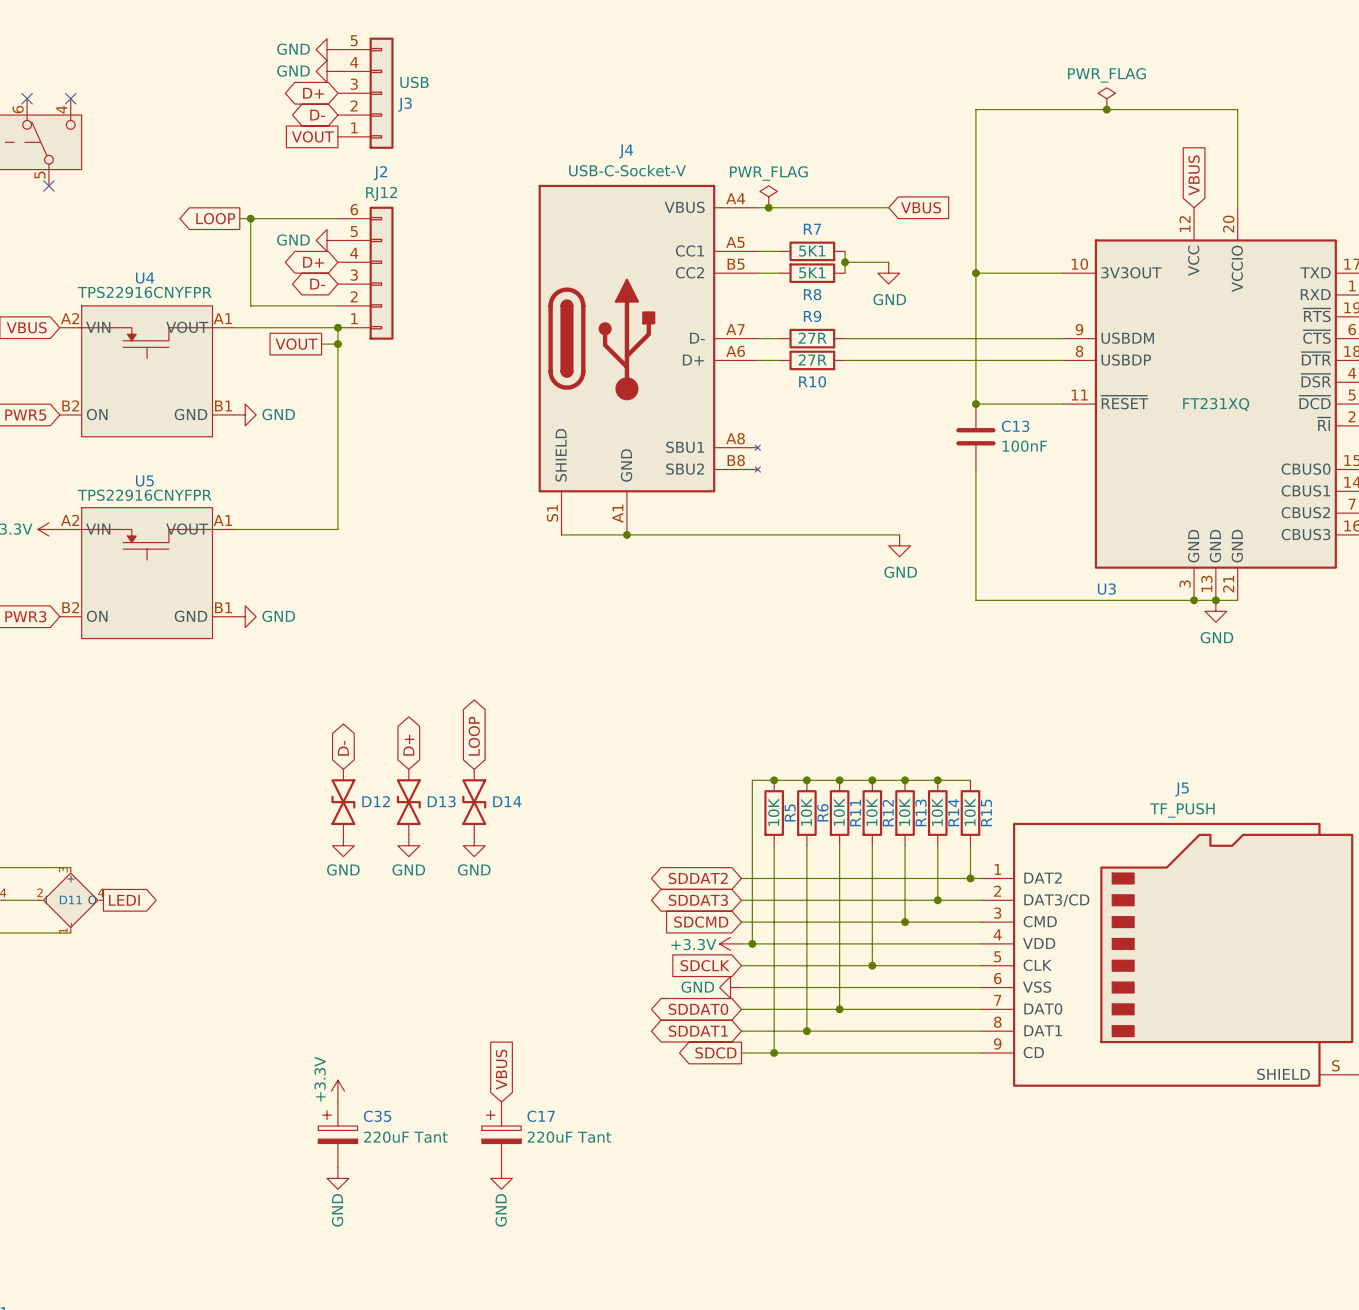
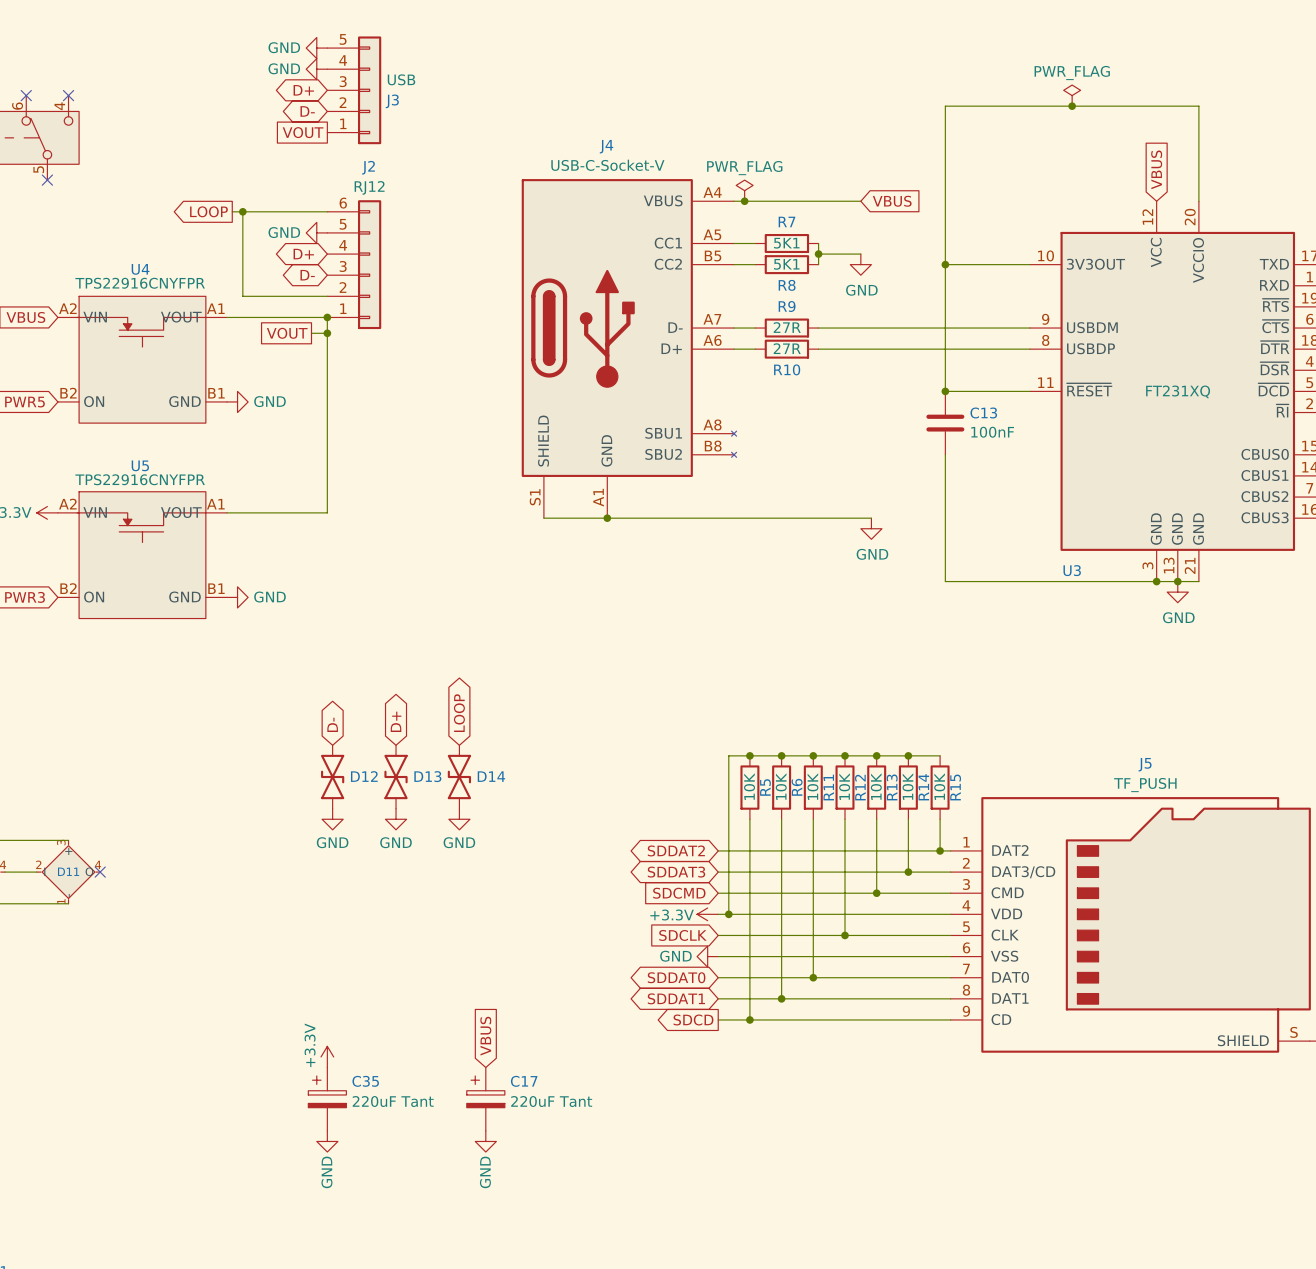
no-connect mark: none -> (100, 872)
global label: LEDI (124, 900) -> none

